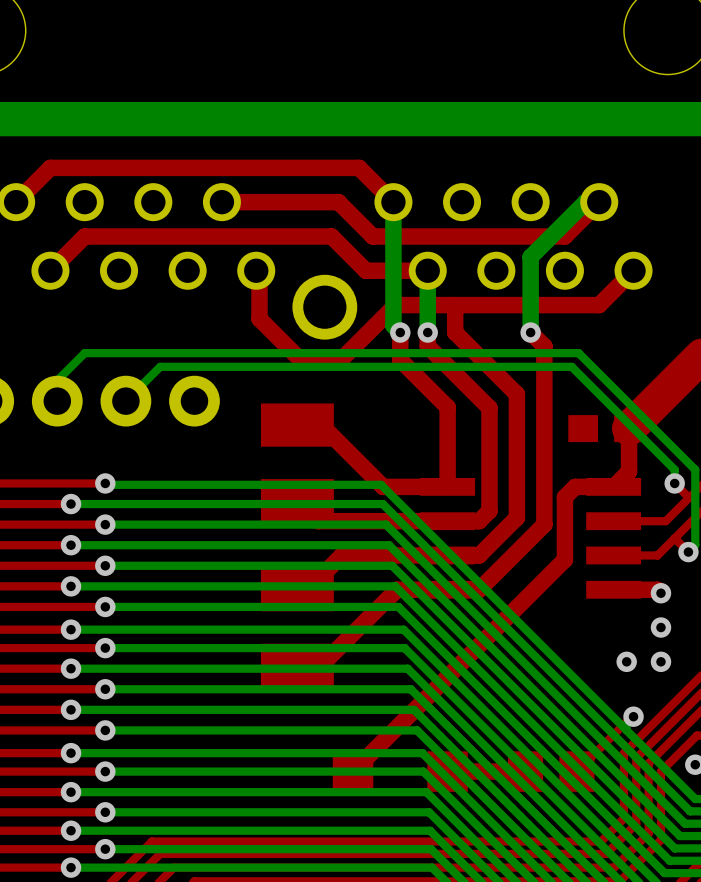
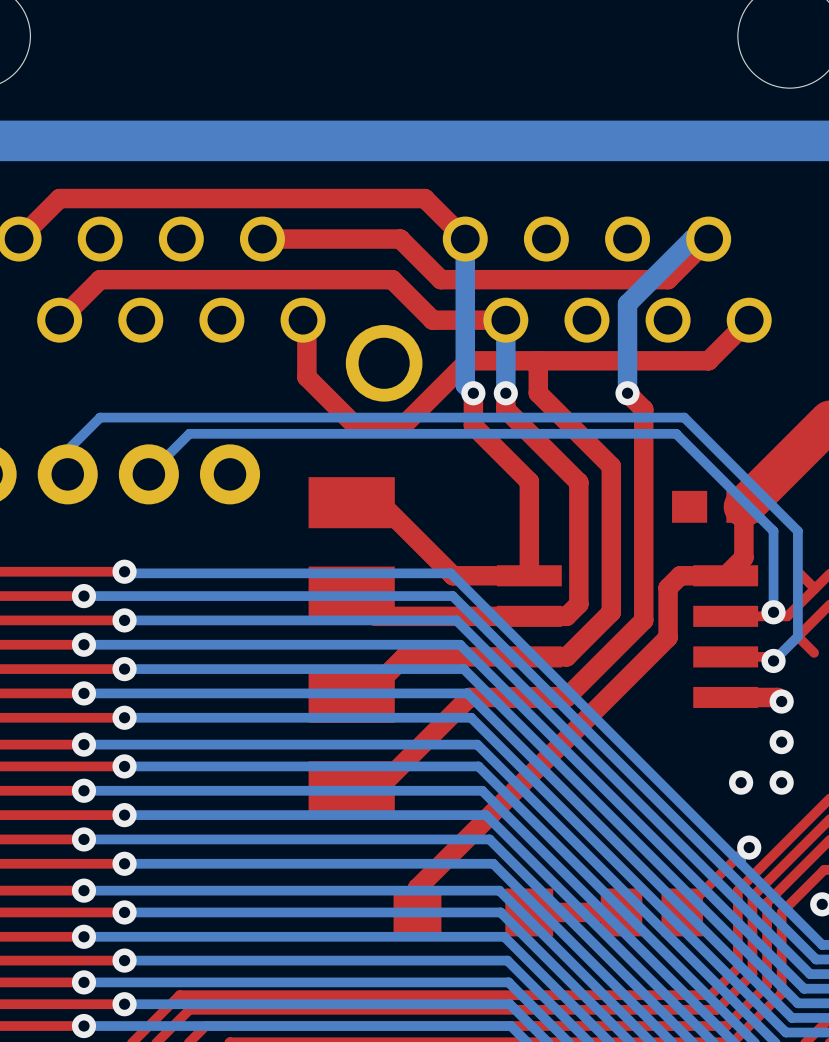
bottom track: (654, 449) (674, 469) -> (797, 531) (797, 555)
bottom track: none -> (773, 531) (773, 612)
bottom track: (674, 449) (695, 469) (695, 545) (688, 552) -> none
bottom track: none -> (797, 571) (797, 636) (773, 660)
via: (674, 483) -> none
via: none -> (773, 612)
top track: (564, 539) (564, 559) (353, 771) -> (668, 637) (417, 888) (417, 912)
via: (688, 552) -> none
via: none -> (773, 660)

